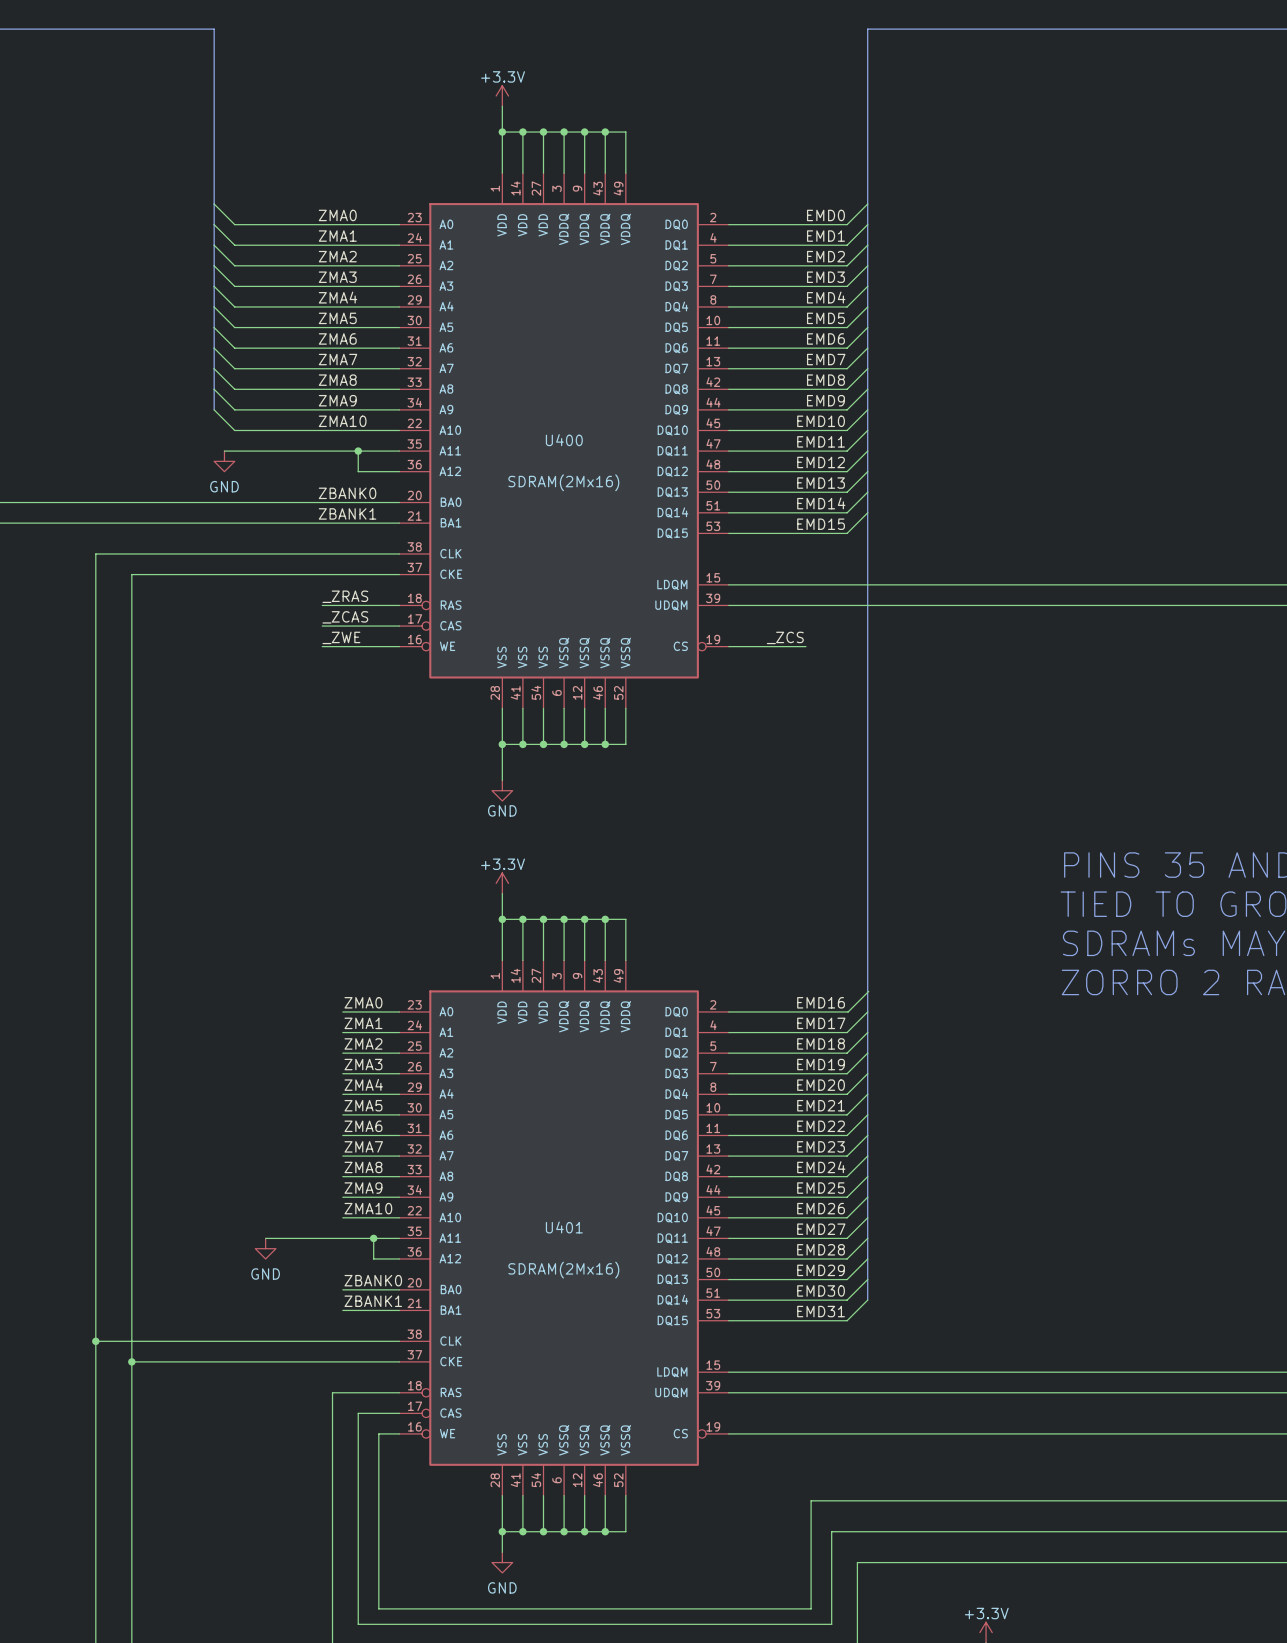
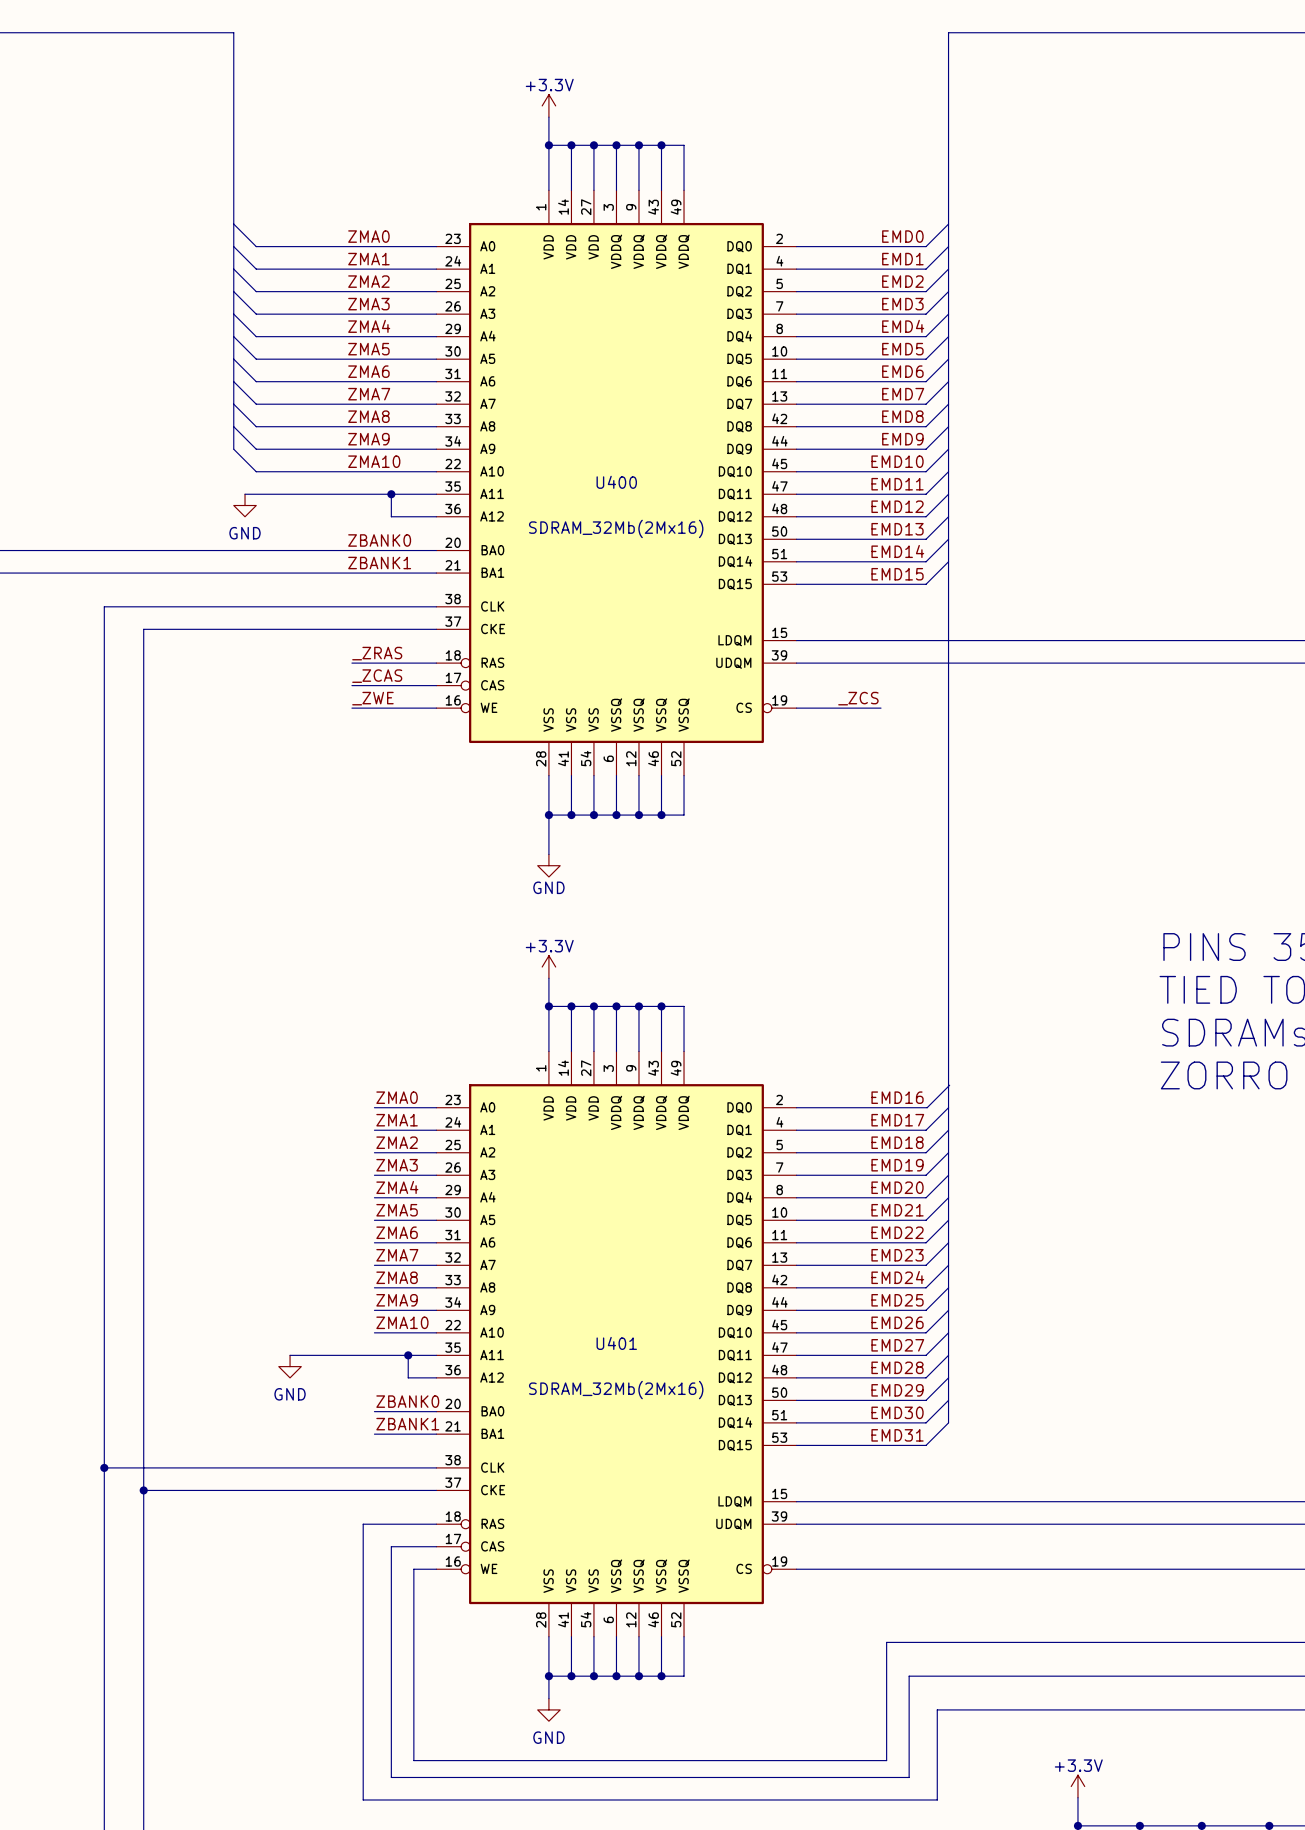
U400 value: SDRAM(2Mx16) (563, 482) -> SDRAM_32Mb(2Mx16) (616, 528)
U401 value: SDRAM(2Mx16) (563, 1270) -> SDRAM_32Mb(2Mx16) (616, 1390)

